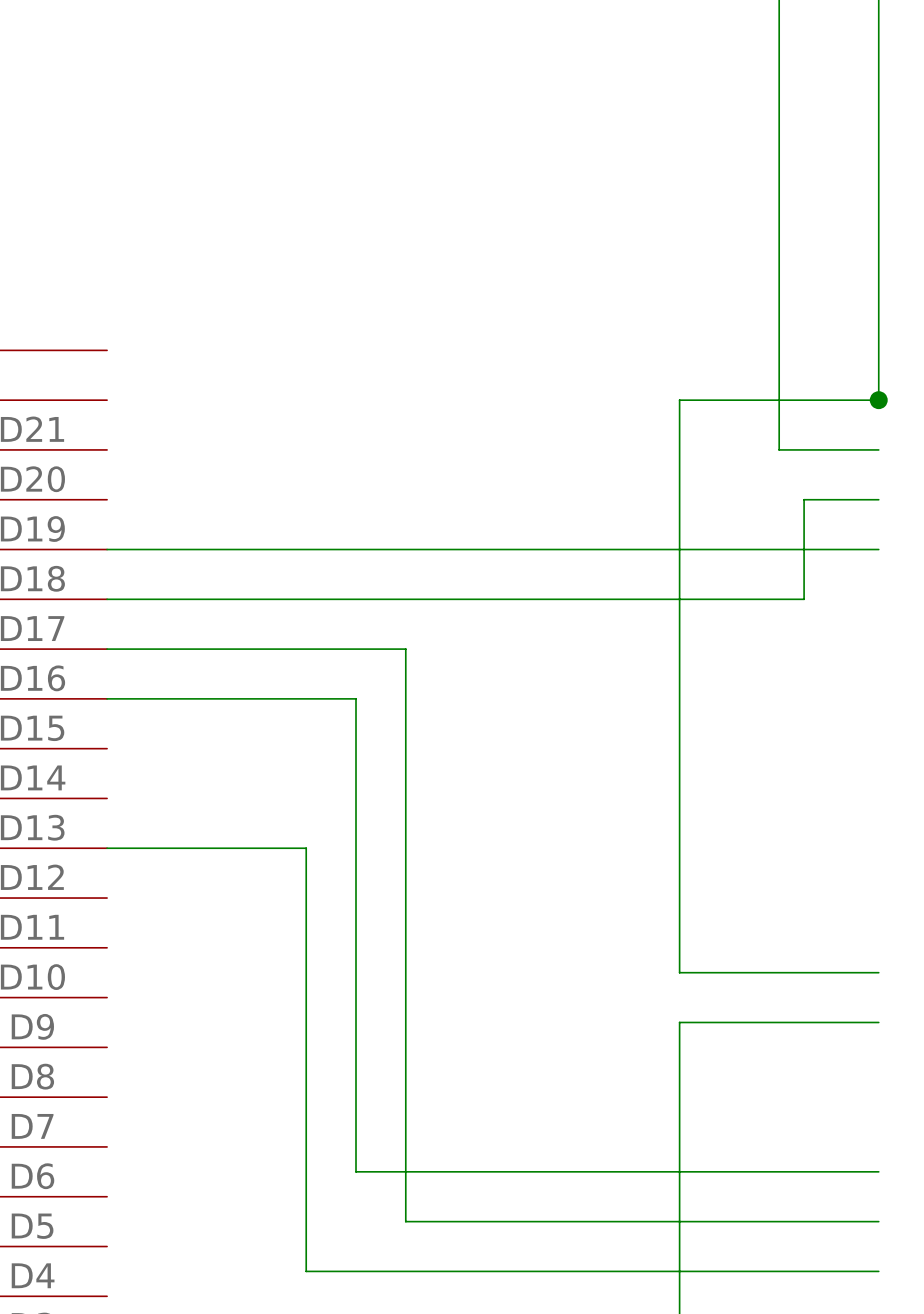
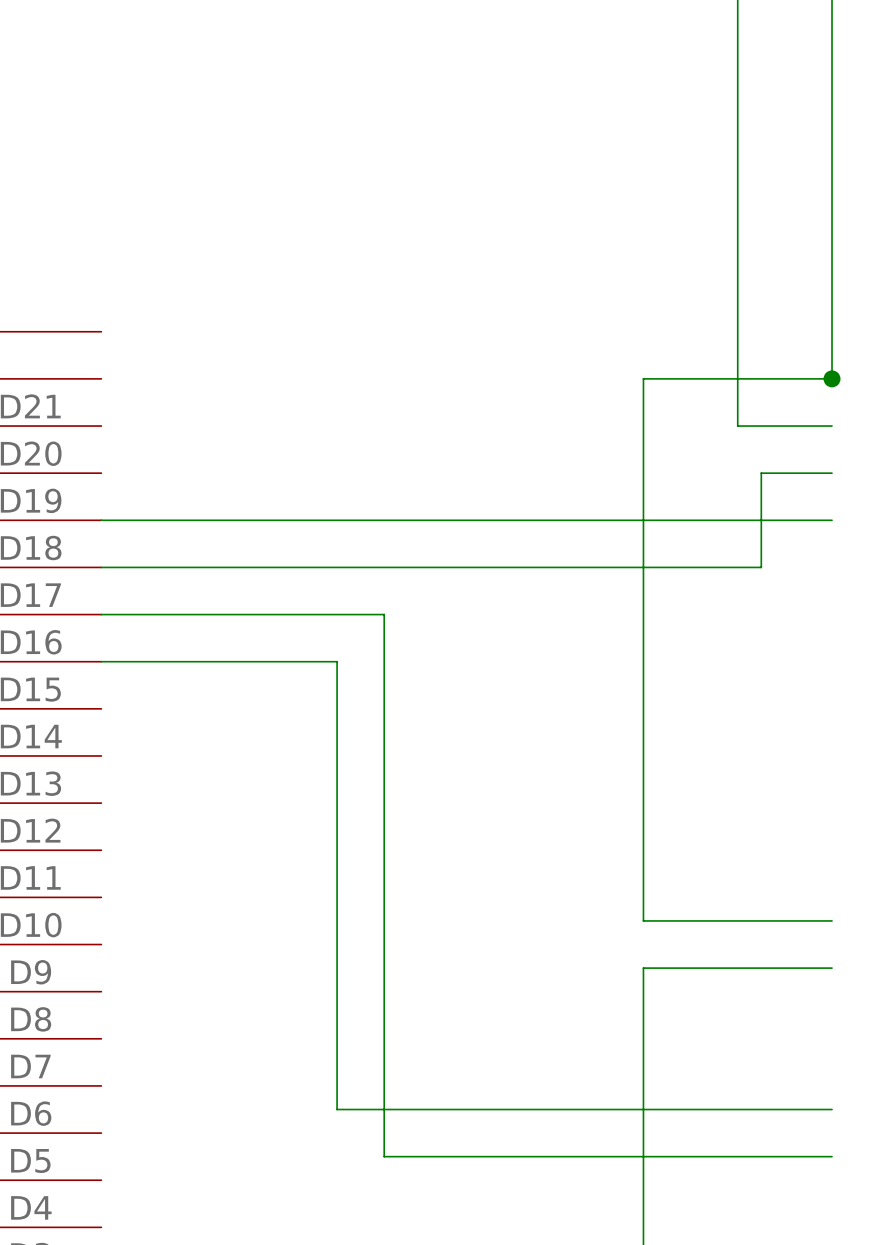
wire: (107, 848) (306, 848) (306, 1271) (878, 1271) -> none

